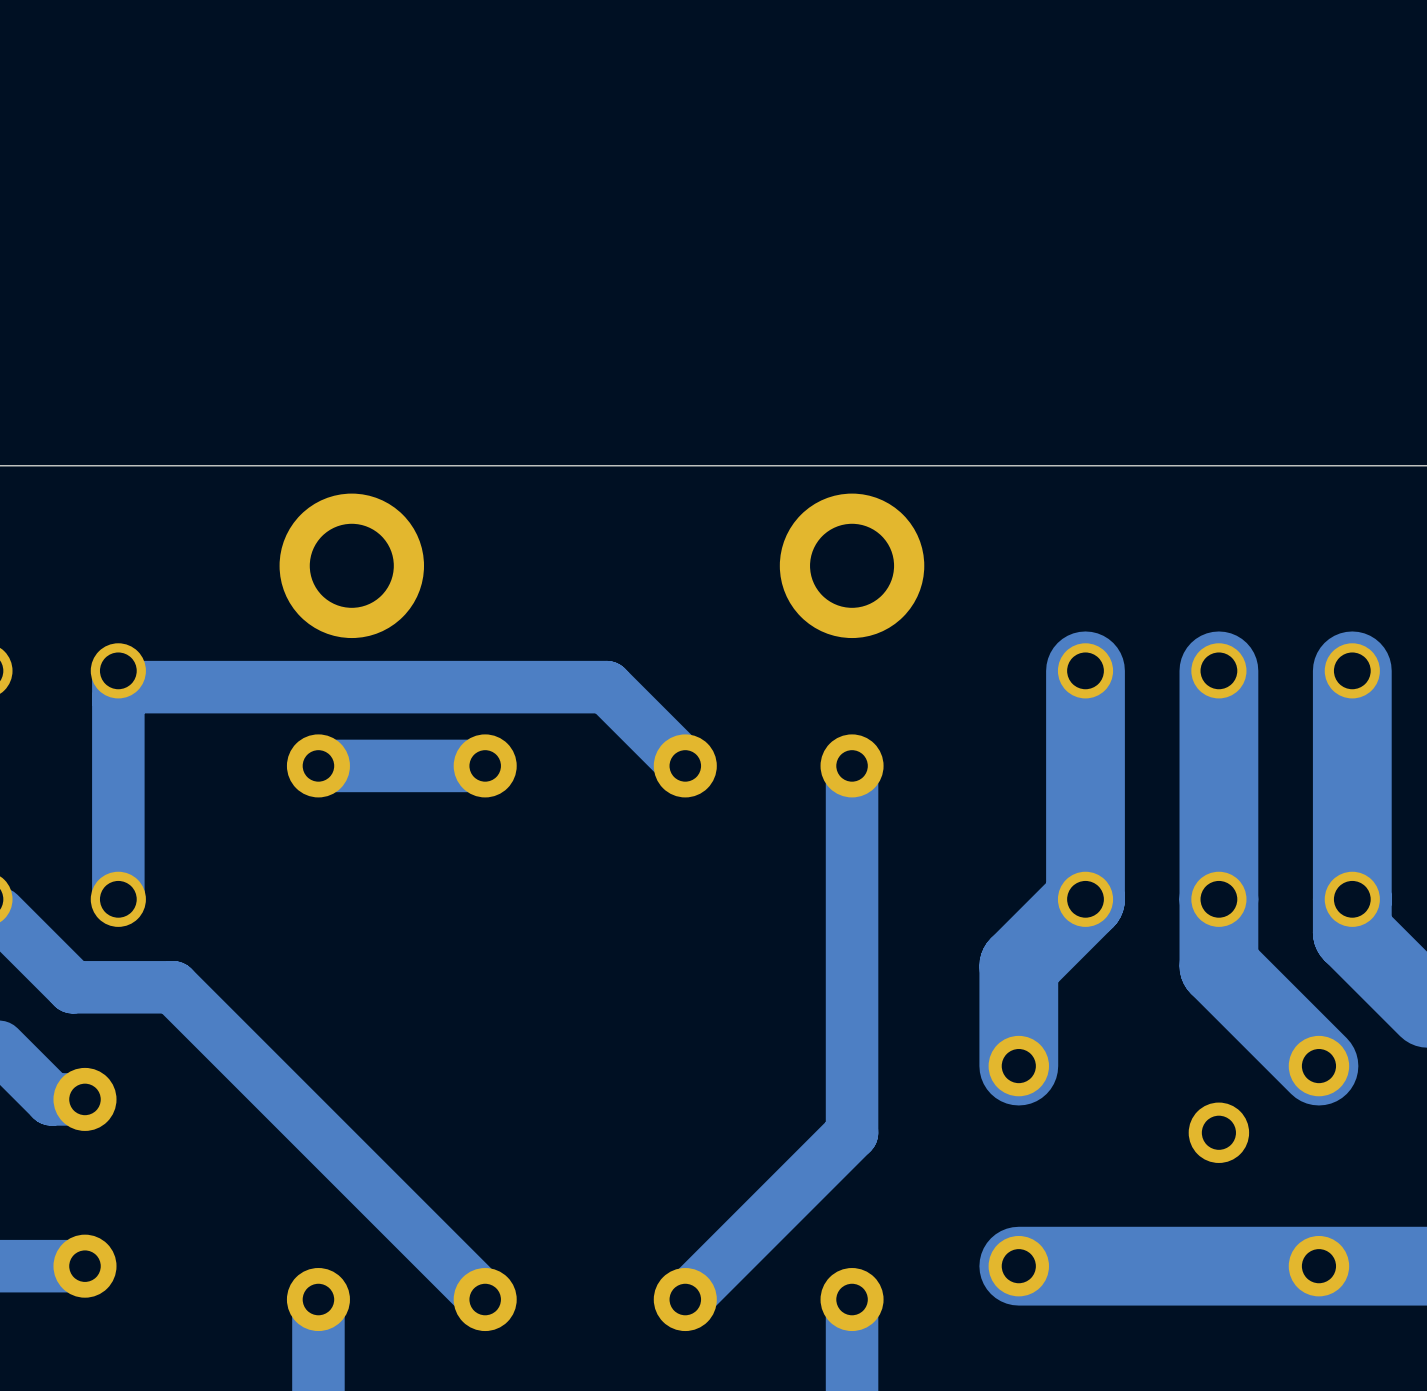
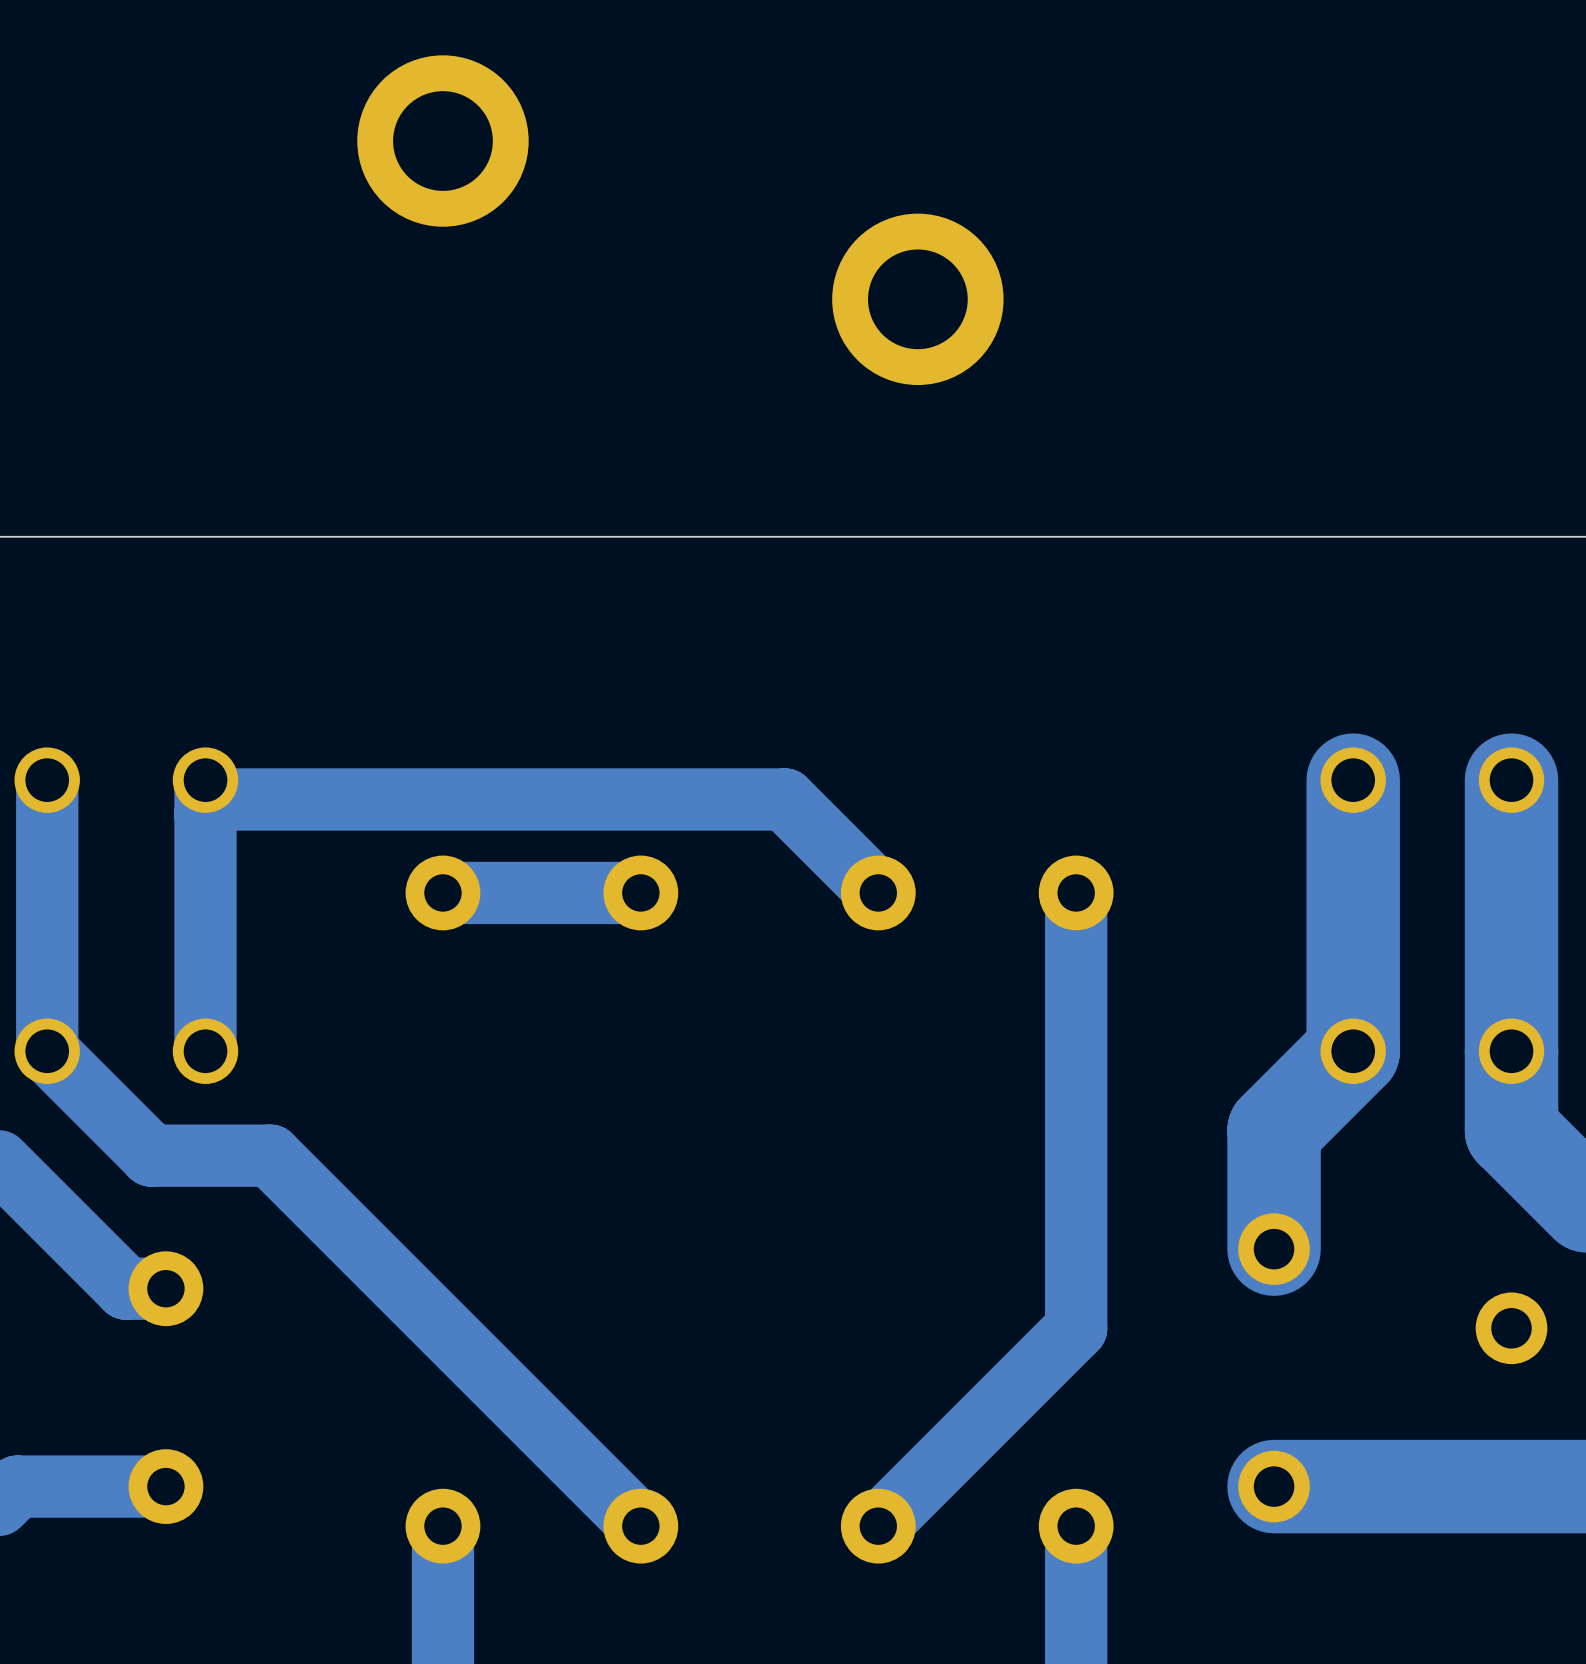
part: none -> (442, 141)
part: none -> (917, 299)
part: (351, 565) -> none
part: (852, 565) -> none

